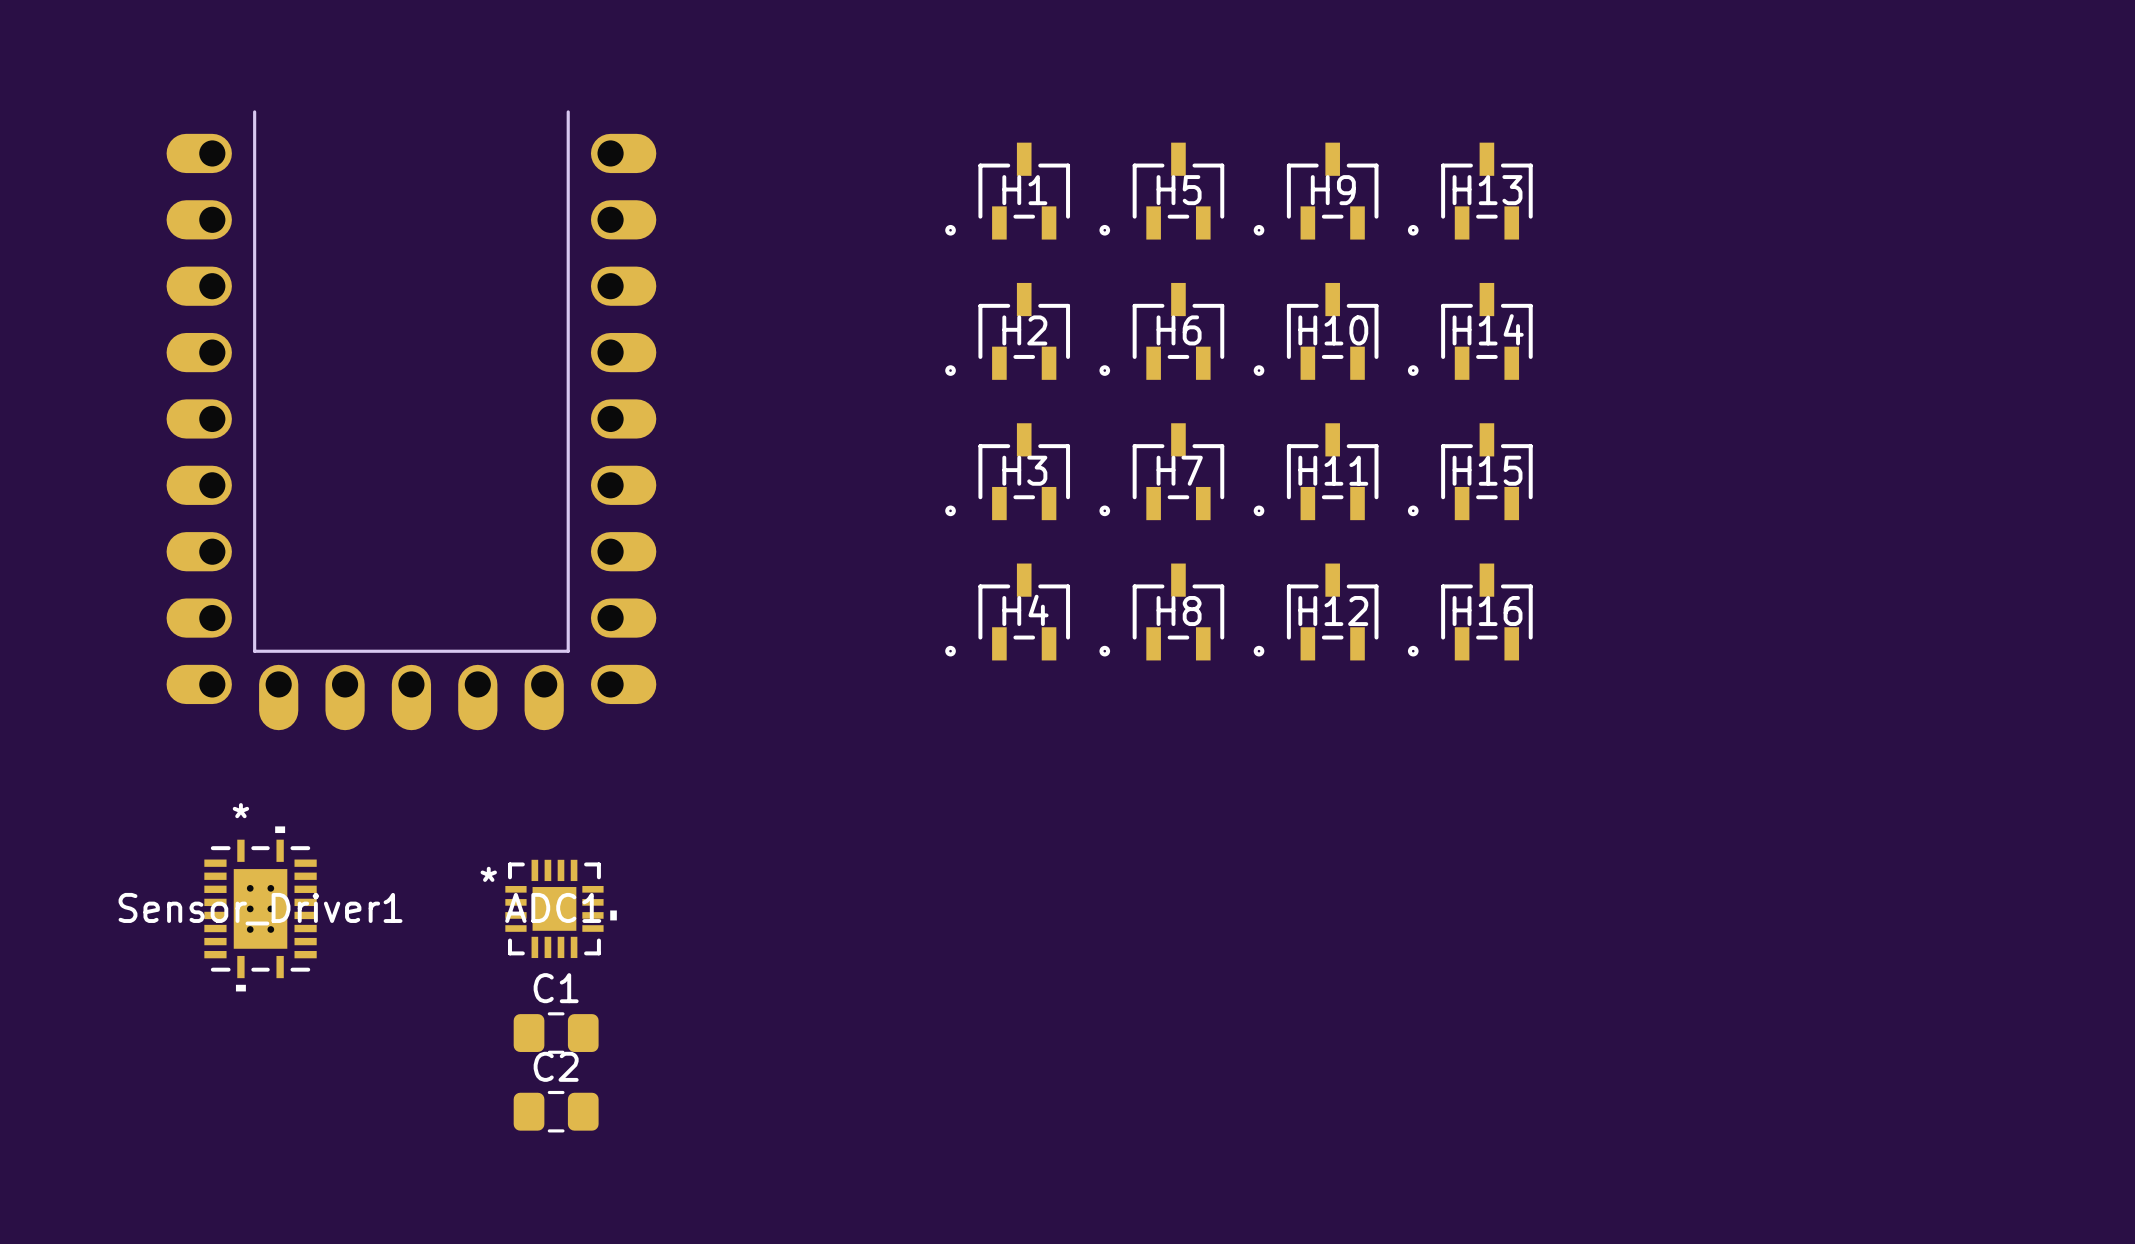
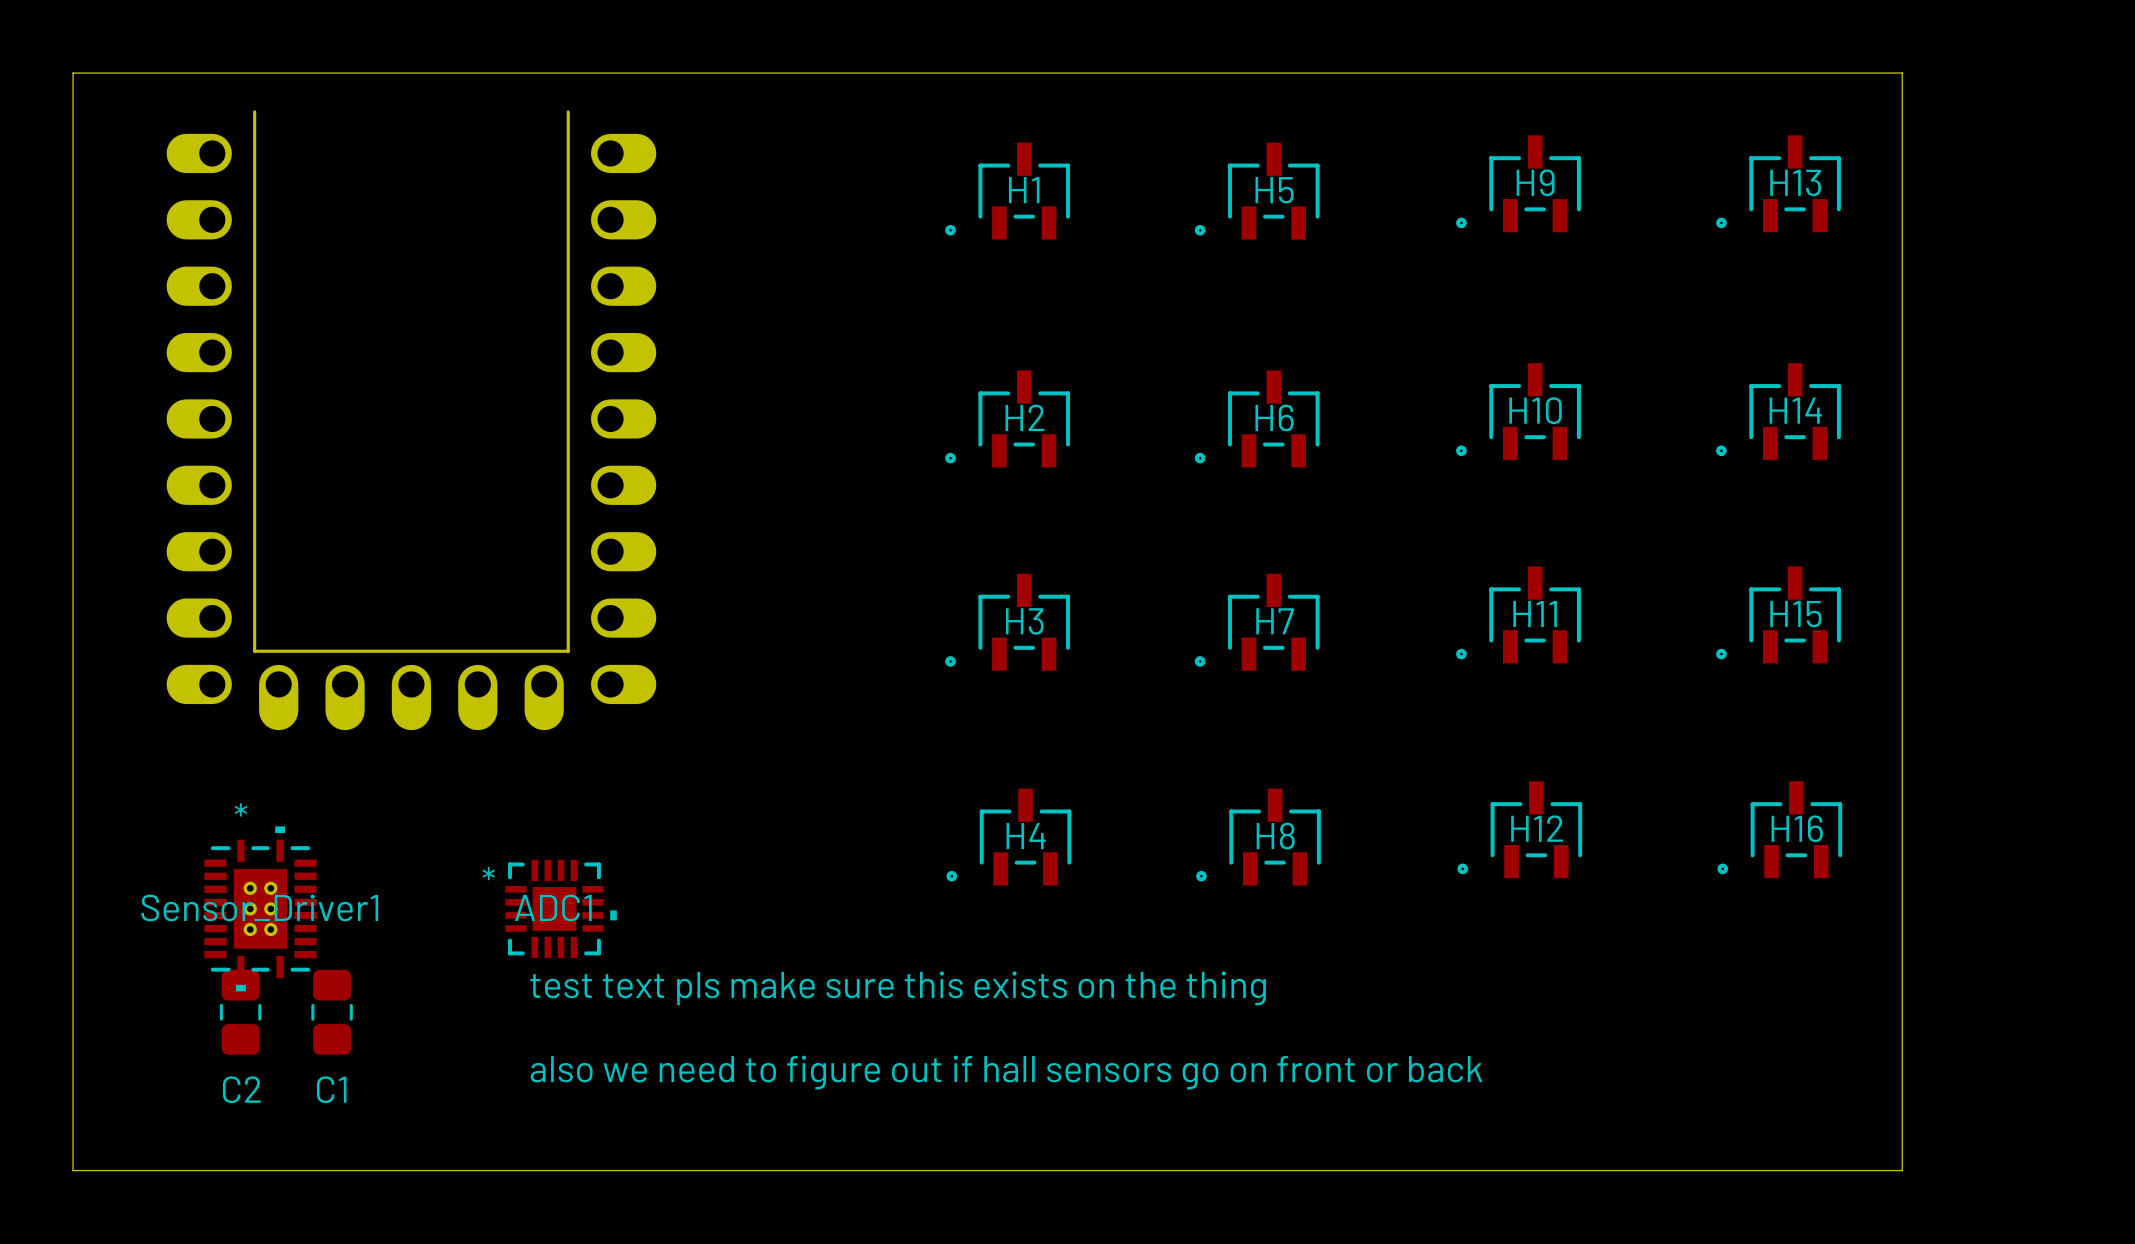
board edge: none -> (73, 73) (1902, 73) (1902, 1170) (73, 1170) (73, 73)
H5 position: (1161, 191) -> (1257, 191)
H9 position: (1316, 191) -> (1518, 183)
H13 position: (1470, 191) -> (1778, 183)
H2 position: (1007, 331) -> (1007, 418)
H6 position: (1161, 331) -> (1257, 418)
H10 position: (1316, 331) -> (1518, 411)
H14 position: (1470, 331) -> (1778, 411)
H3 position: (1007, 471) -> (1007, 622)
H7 position: (1161, 471) -> (1257, 622)
H11 position: (1316, 471) -> (1518, 614)
H15 position: (1470, 471) -> (1778, 614)
H4 position: (1007, 611) -> (1008, 837)
H8 position: (1161, 611) -> (1258, 837)
H12 position: (1316, 611) -> (1519, 829)
H16 position: (1470, 611) -> (1779, 829)
C1 name position: C1 (556, 988) -> C1 (331, 1089)
text: none -> test text pls make sure this exists on the thing (898, 988)
C1 rotation: 0° (556, 1033) -> 90° clockwise (332, 1012)
C1 position: (556, 1033) -> (332, 1012)
C2 name position: C2 (556, 1066) -> C2 (241, 1089)
text: none -> also we need to figure out if hall sensors go on front or back (1006, 1072)
C2 rotation: 0° (556, 1111) -> 90° clockwise (240, 1012)
C2 position: (556, 1111) -> (240, 1012)

